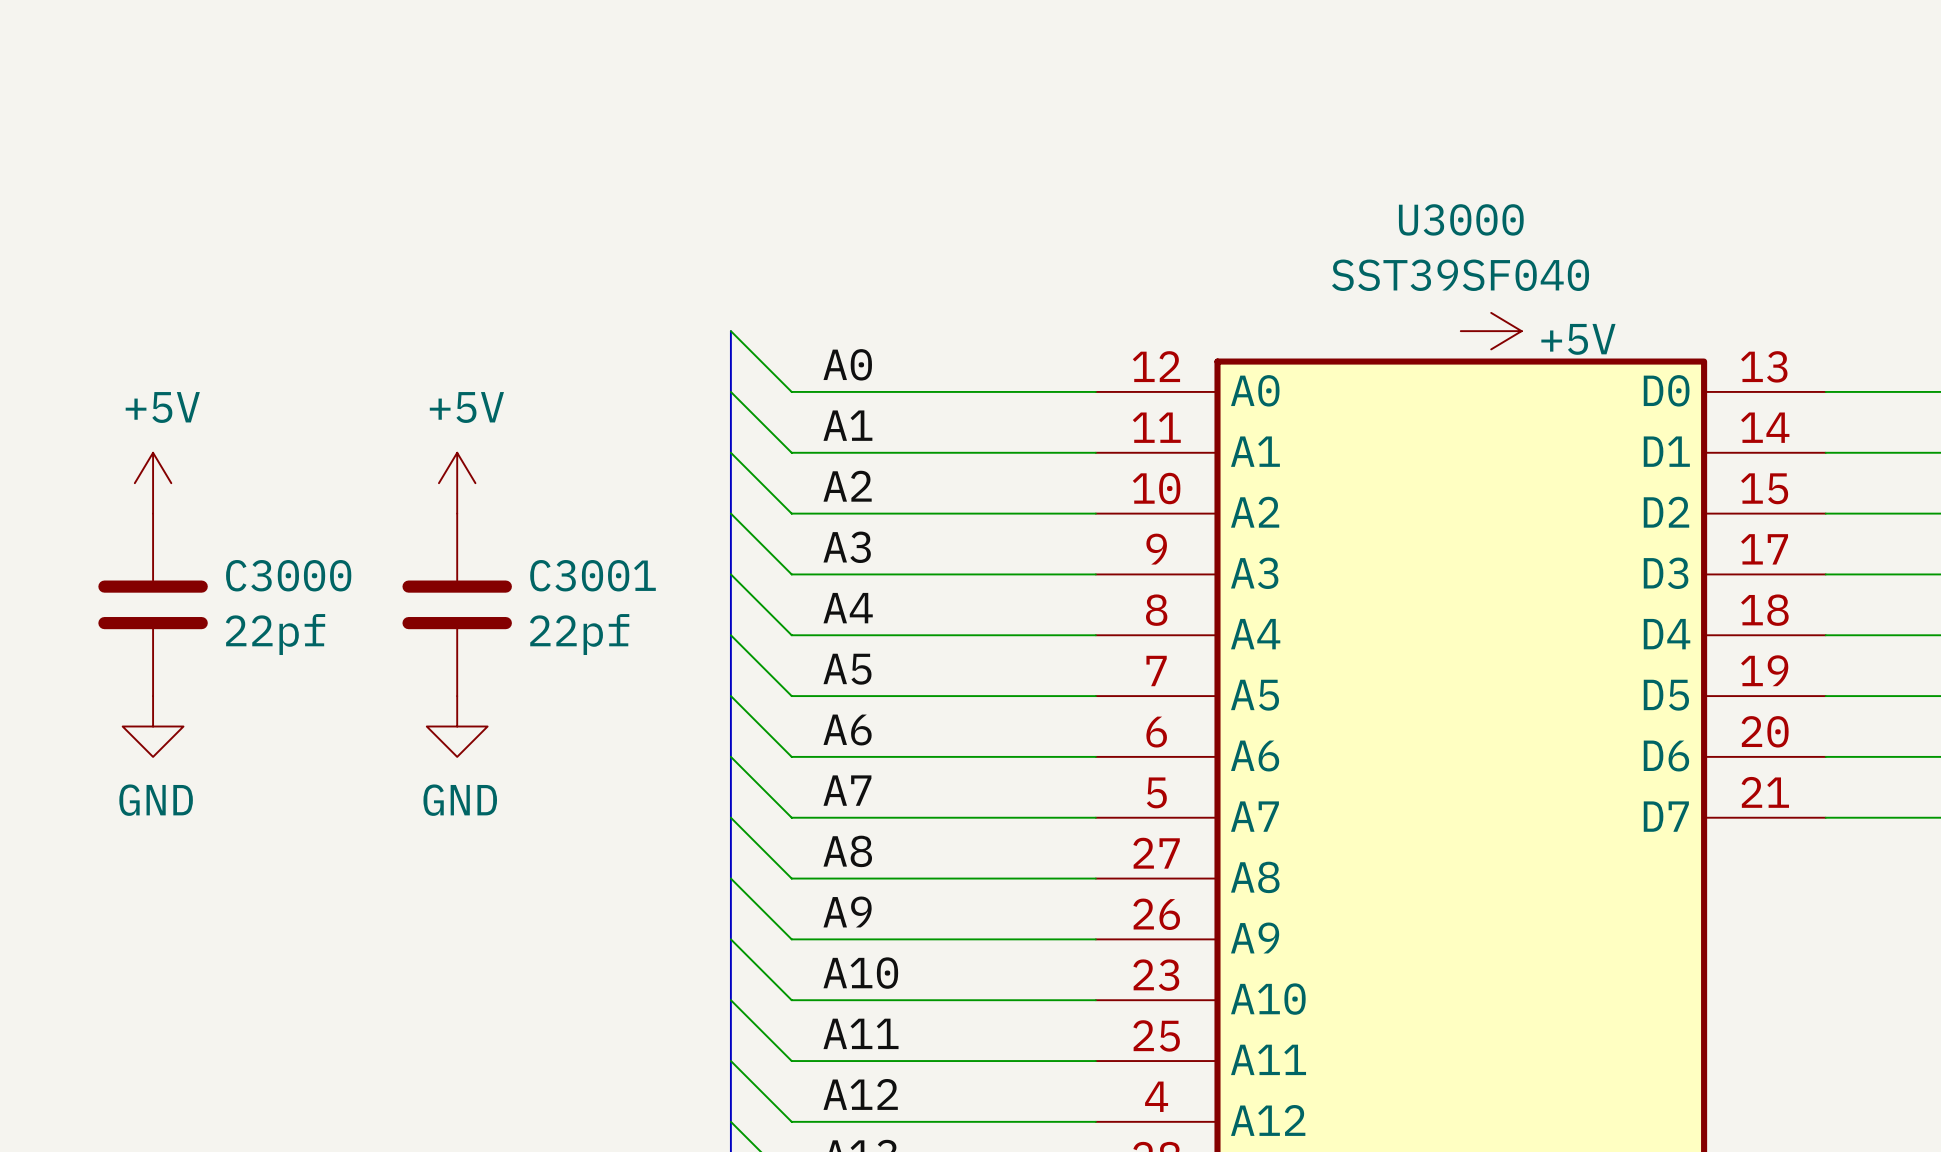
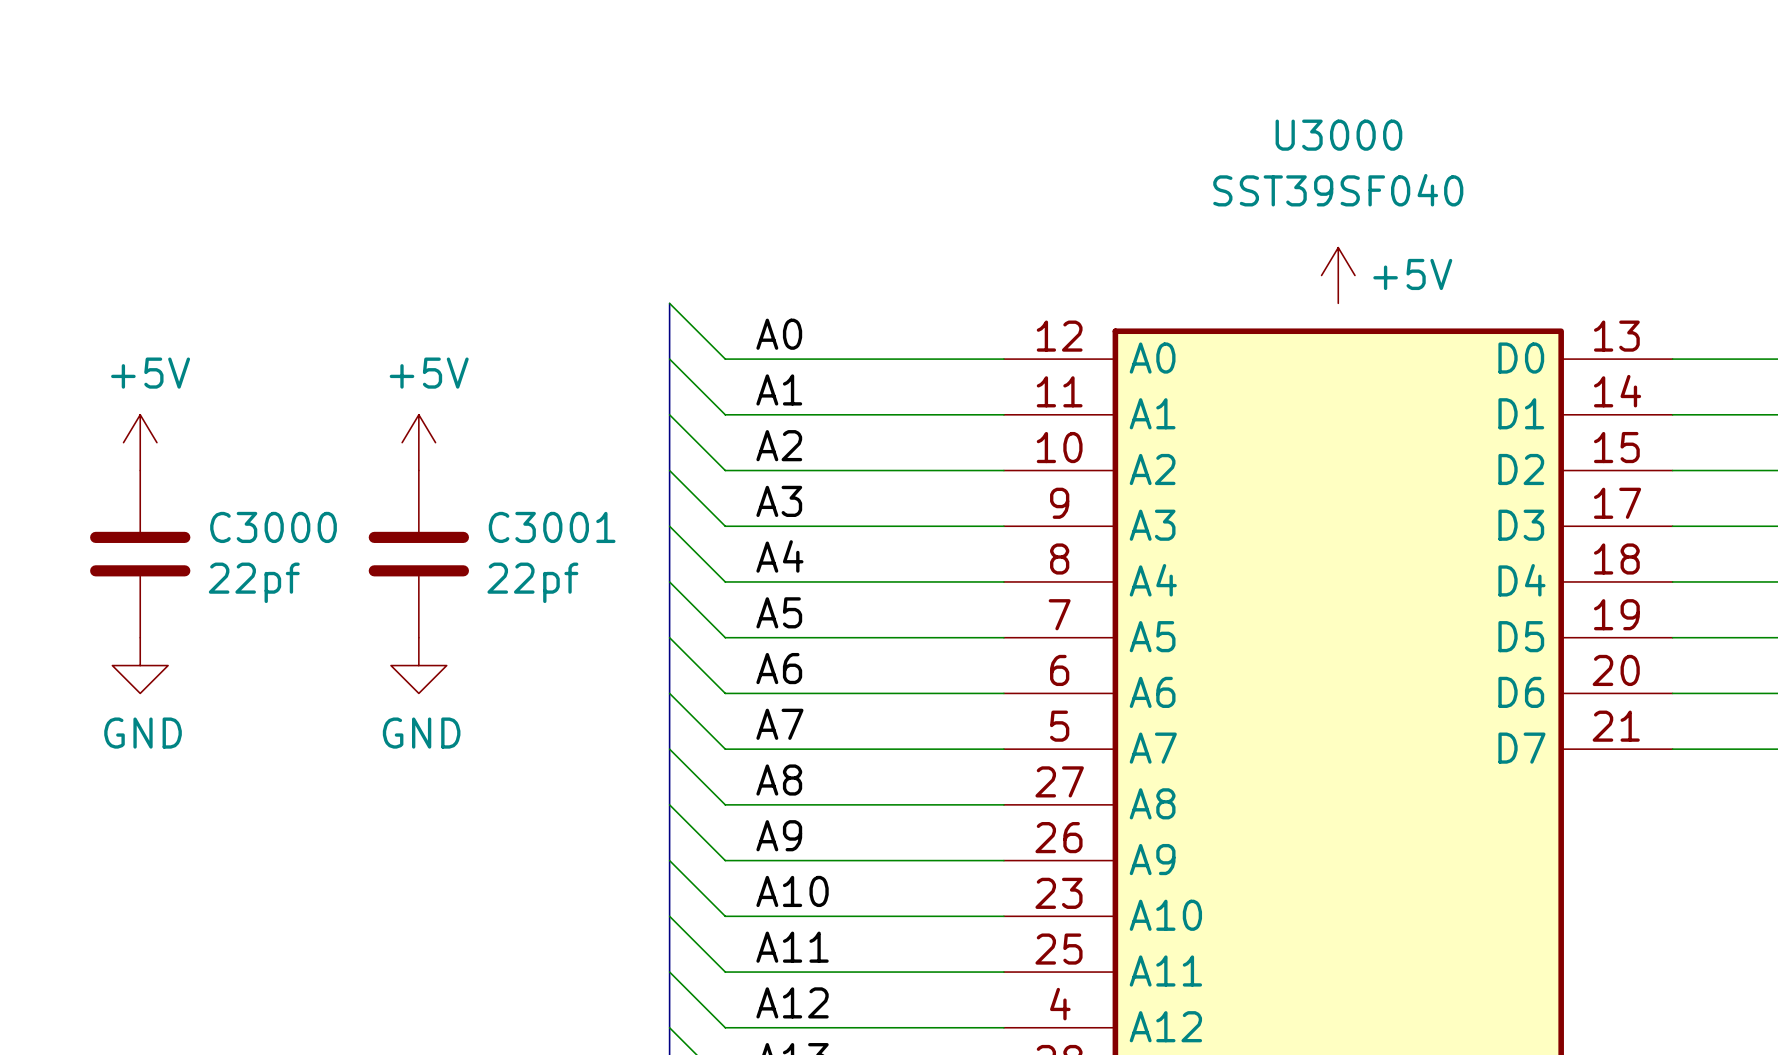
U3000 name position: U3000 (1461, 219) -> U3000 (1338, 135)
U3000 value position: SST39SF040 (1460, 275) -> SST39SF040 (1338, 190)
power symbol rotation: 0° (1491, 331) -> 90° counterclockwise (1338, 275)
power symbol position: +5V (1491, 331) -> +5V (1338, 275)

